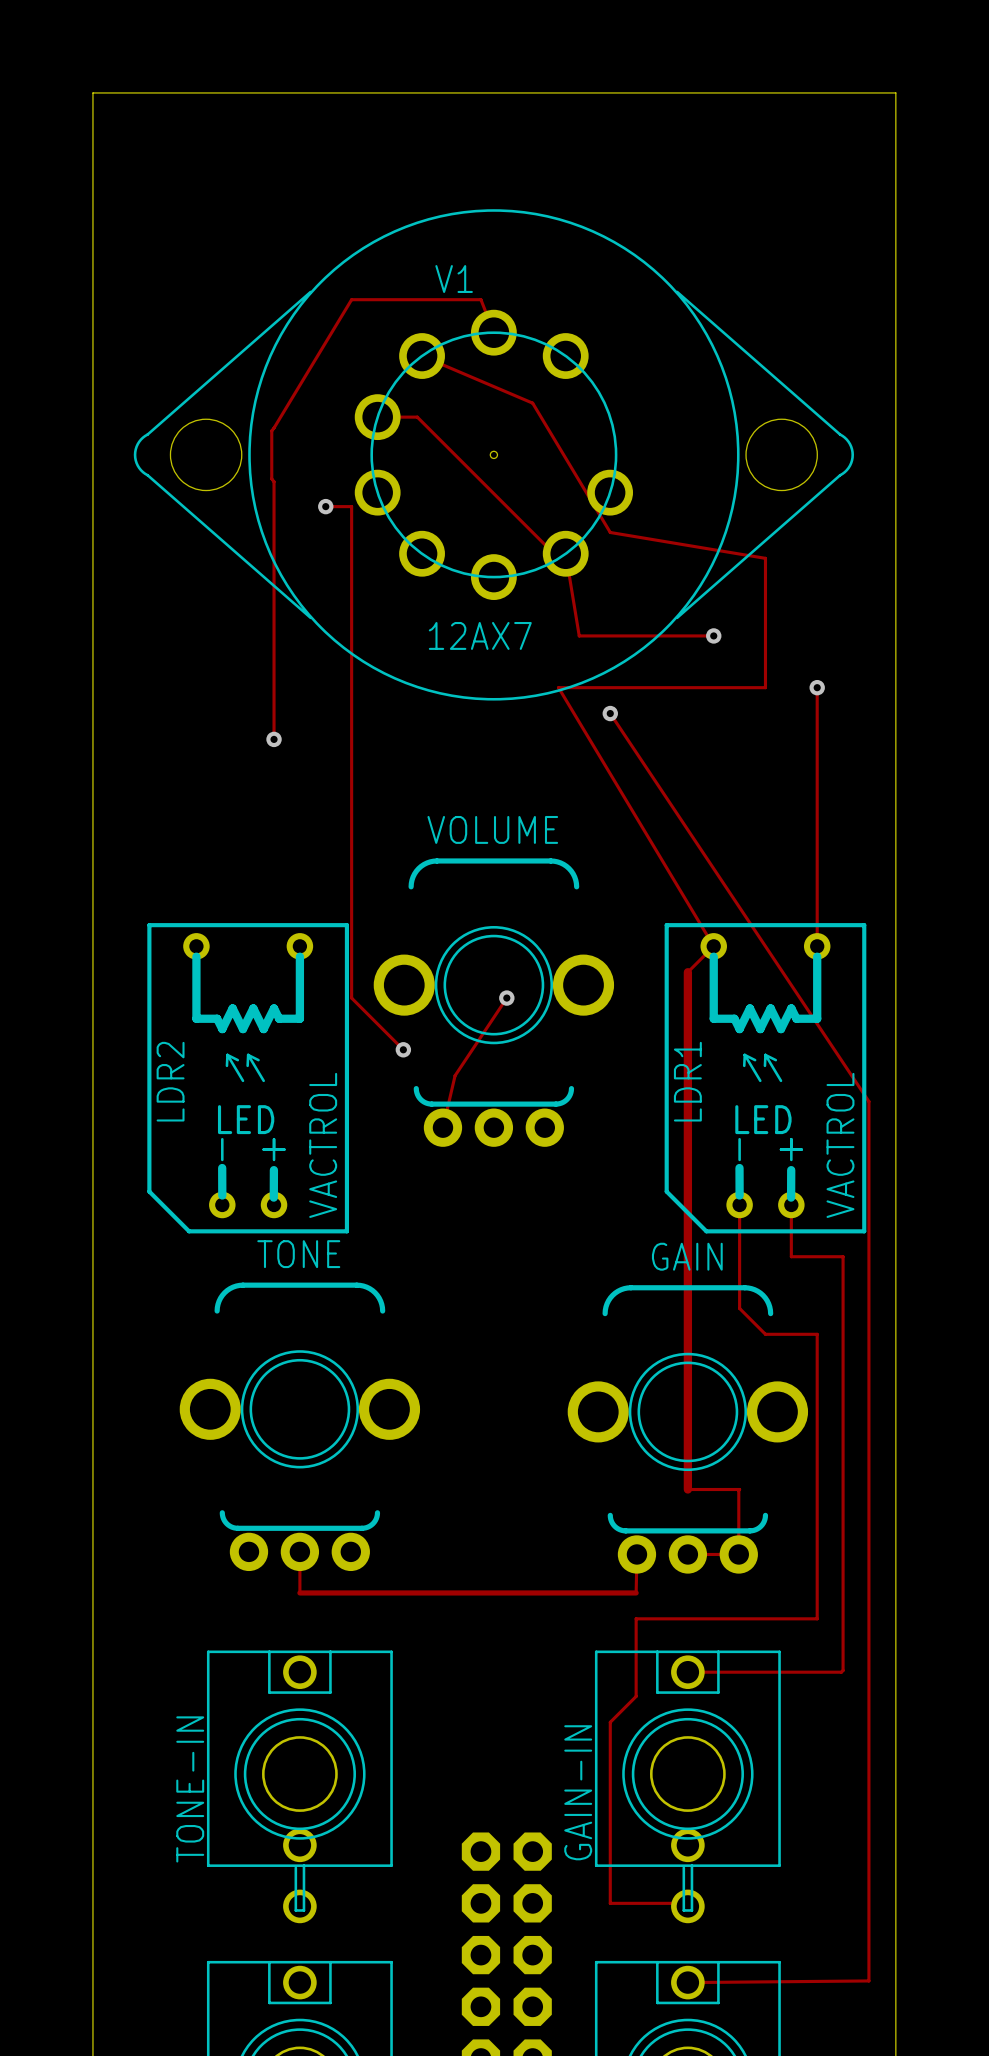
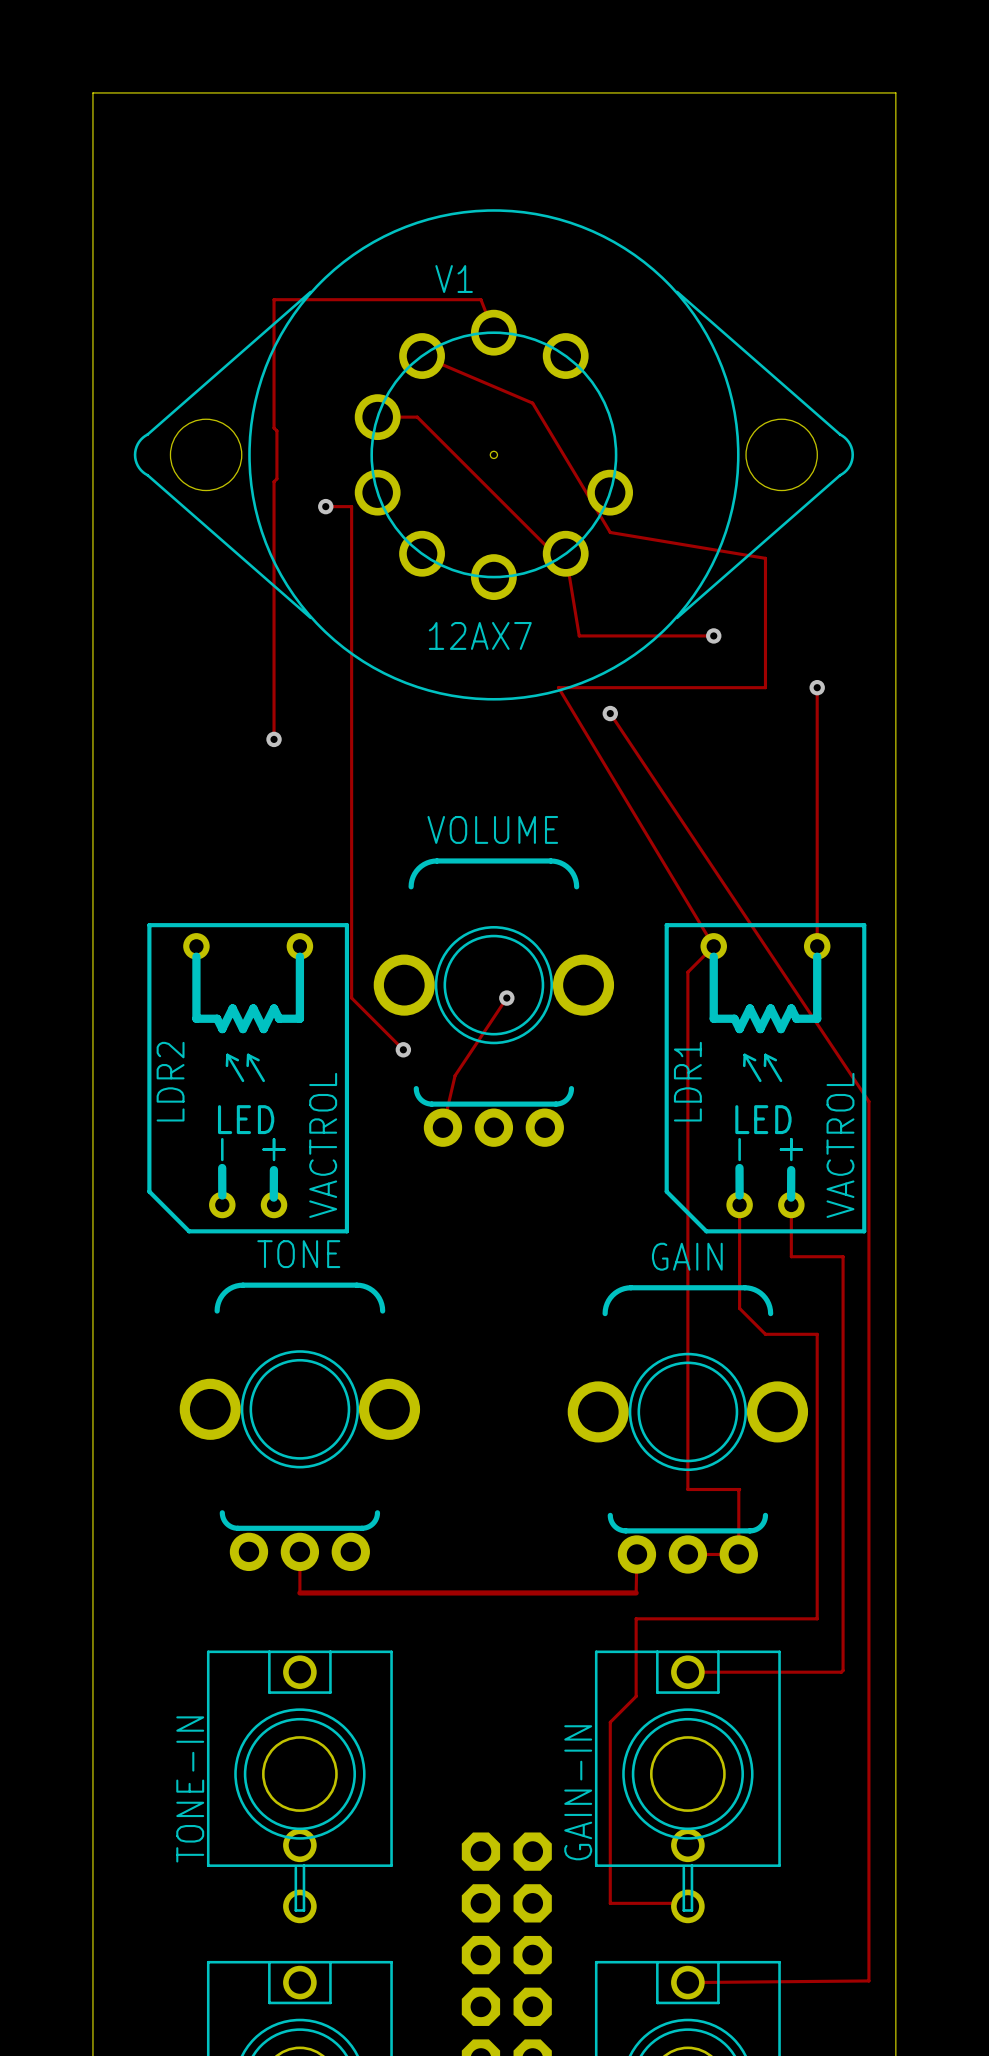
track: (351, 299) (271, 430) (271, 478) (274, 481) -> (351, 299) (274, 299) (274, 428) (276, 430) (276, 478) (274, 481)
track width: thick (687, 972) (687, 1489) -> thin (687, 972) (687, 1489)

